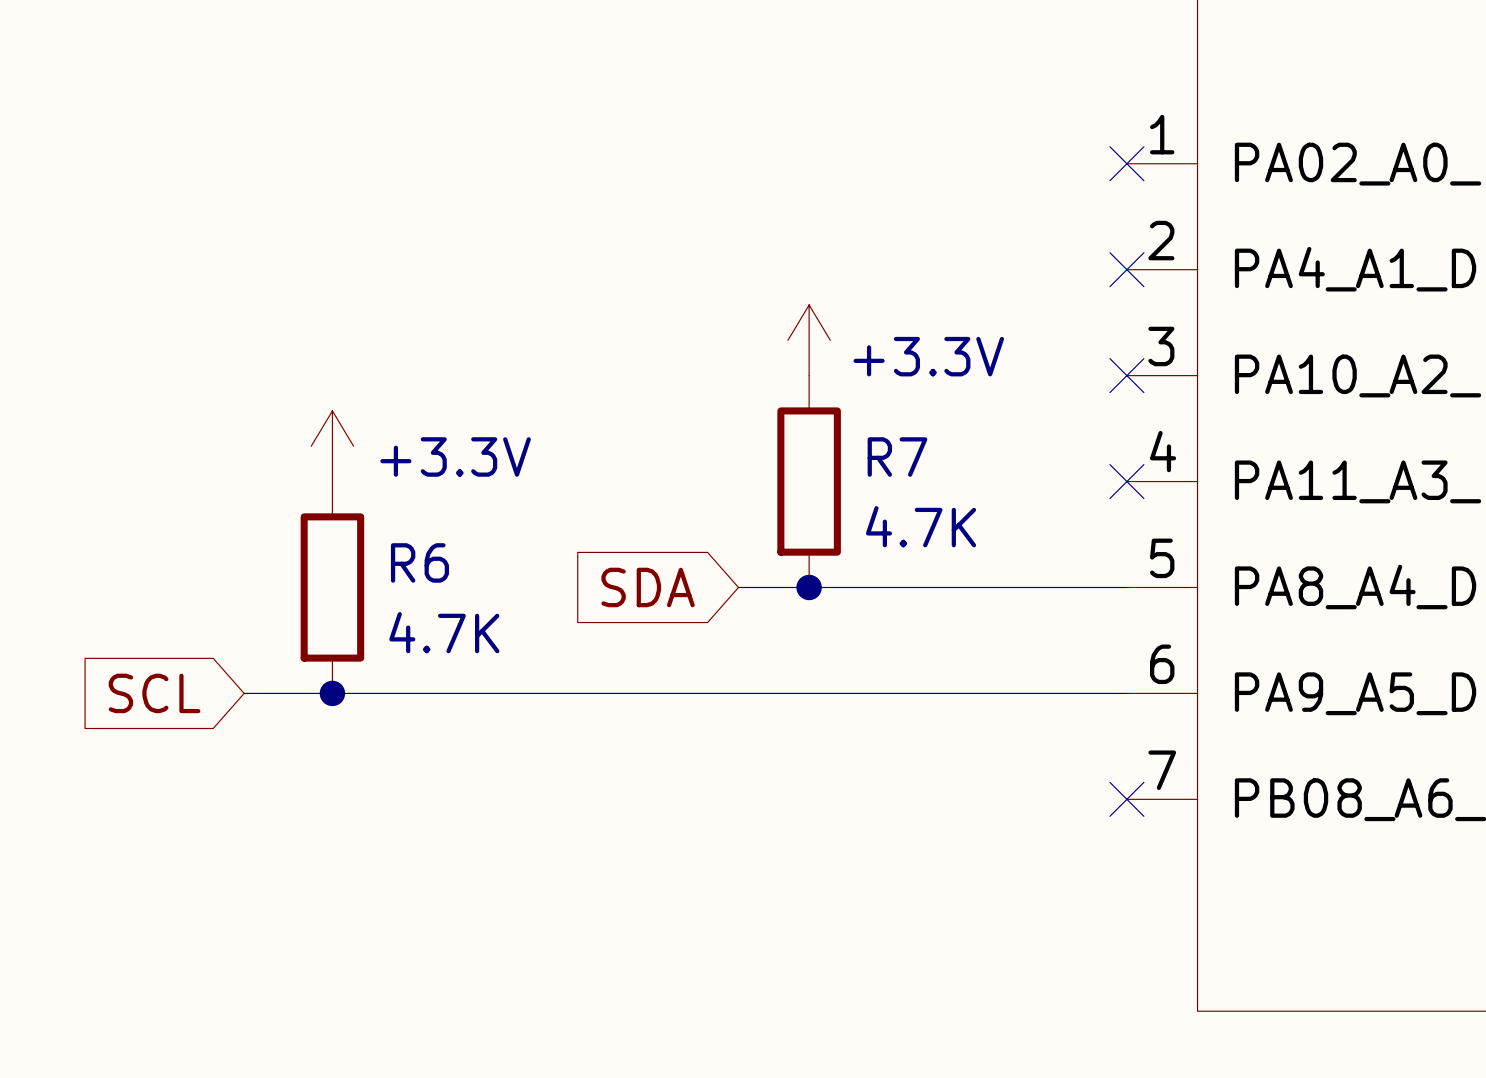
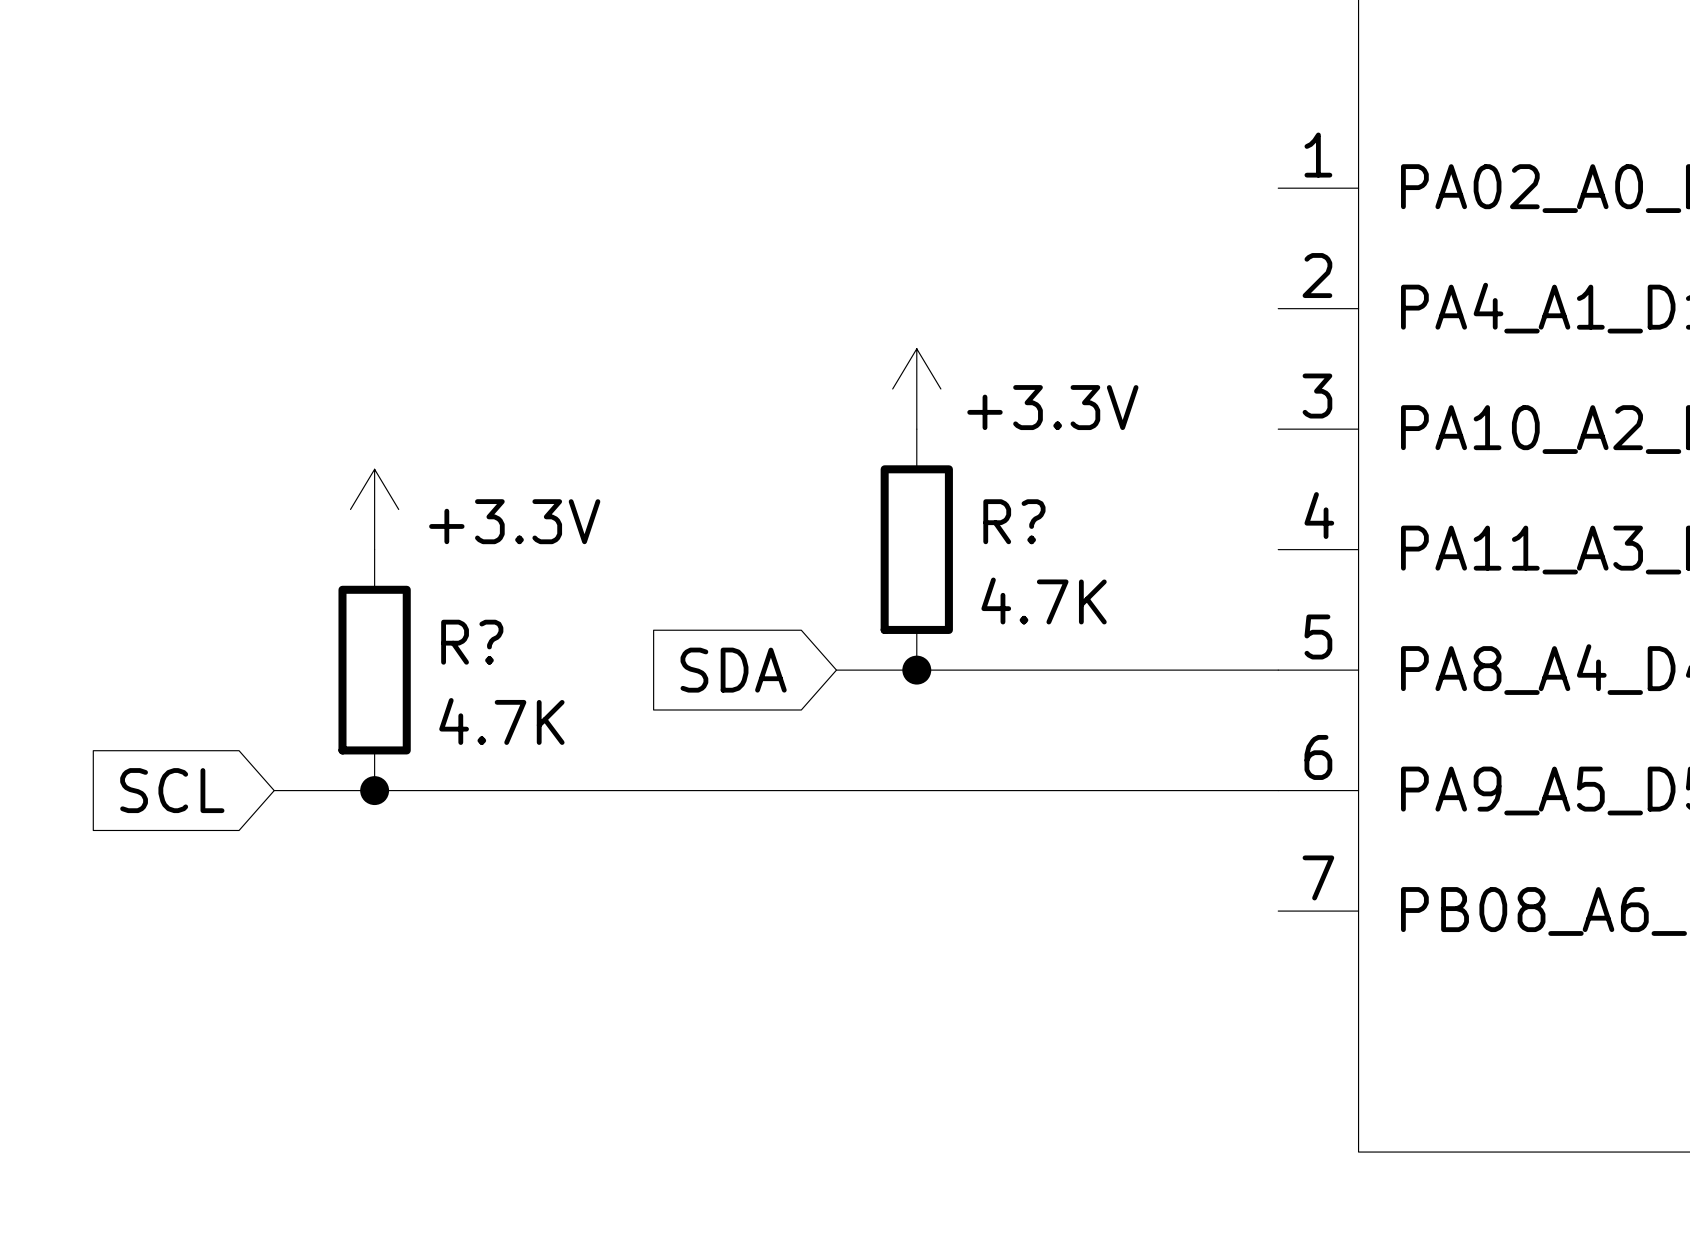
no-connect mark: (1126, 163) -> none
no-connect mark: (1126, 269) -> none
no-connect mark: (1126, 375) -> none
R7 name: R7 (897, 457) -> R? (1014, 521)
no-connect mark: (1126, 481) -> none
R6 name: R6 (419, 562) -> R? (472, 642)
no-connect mark: (1126, 799) -> none

